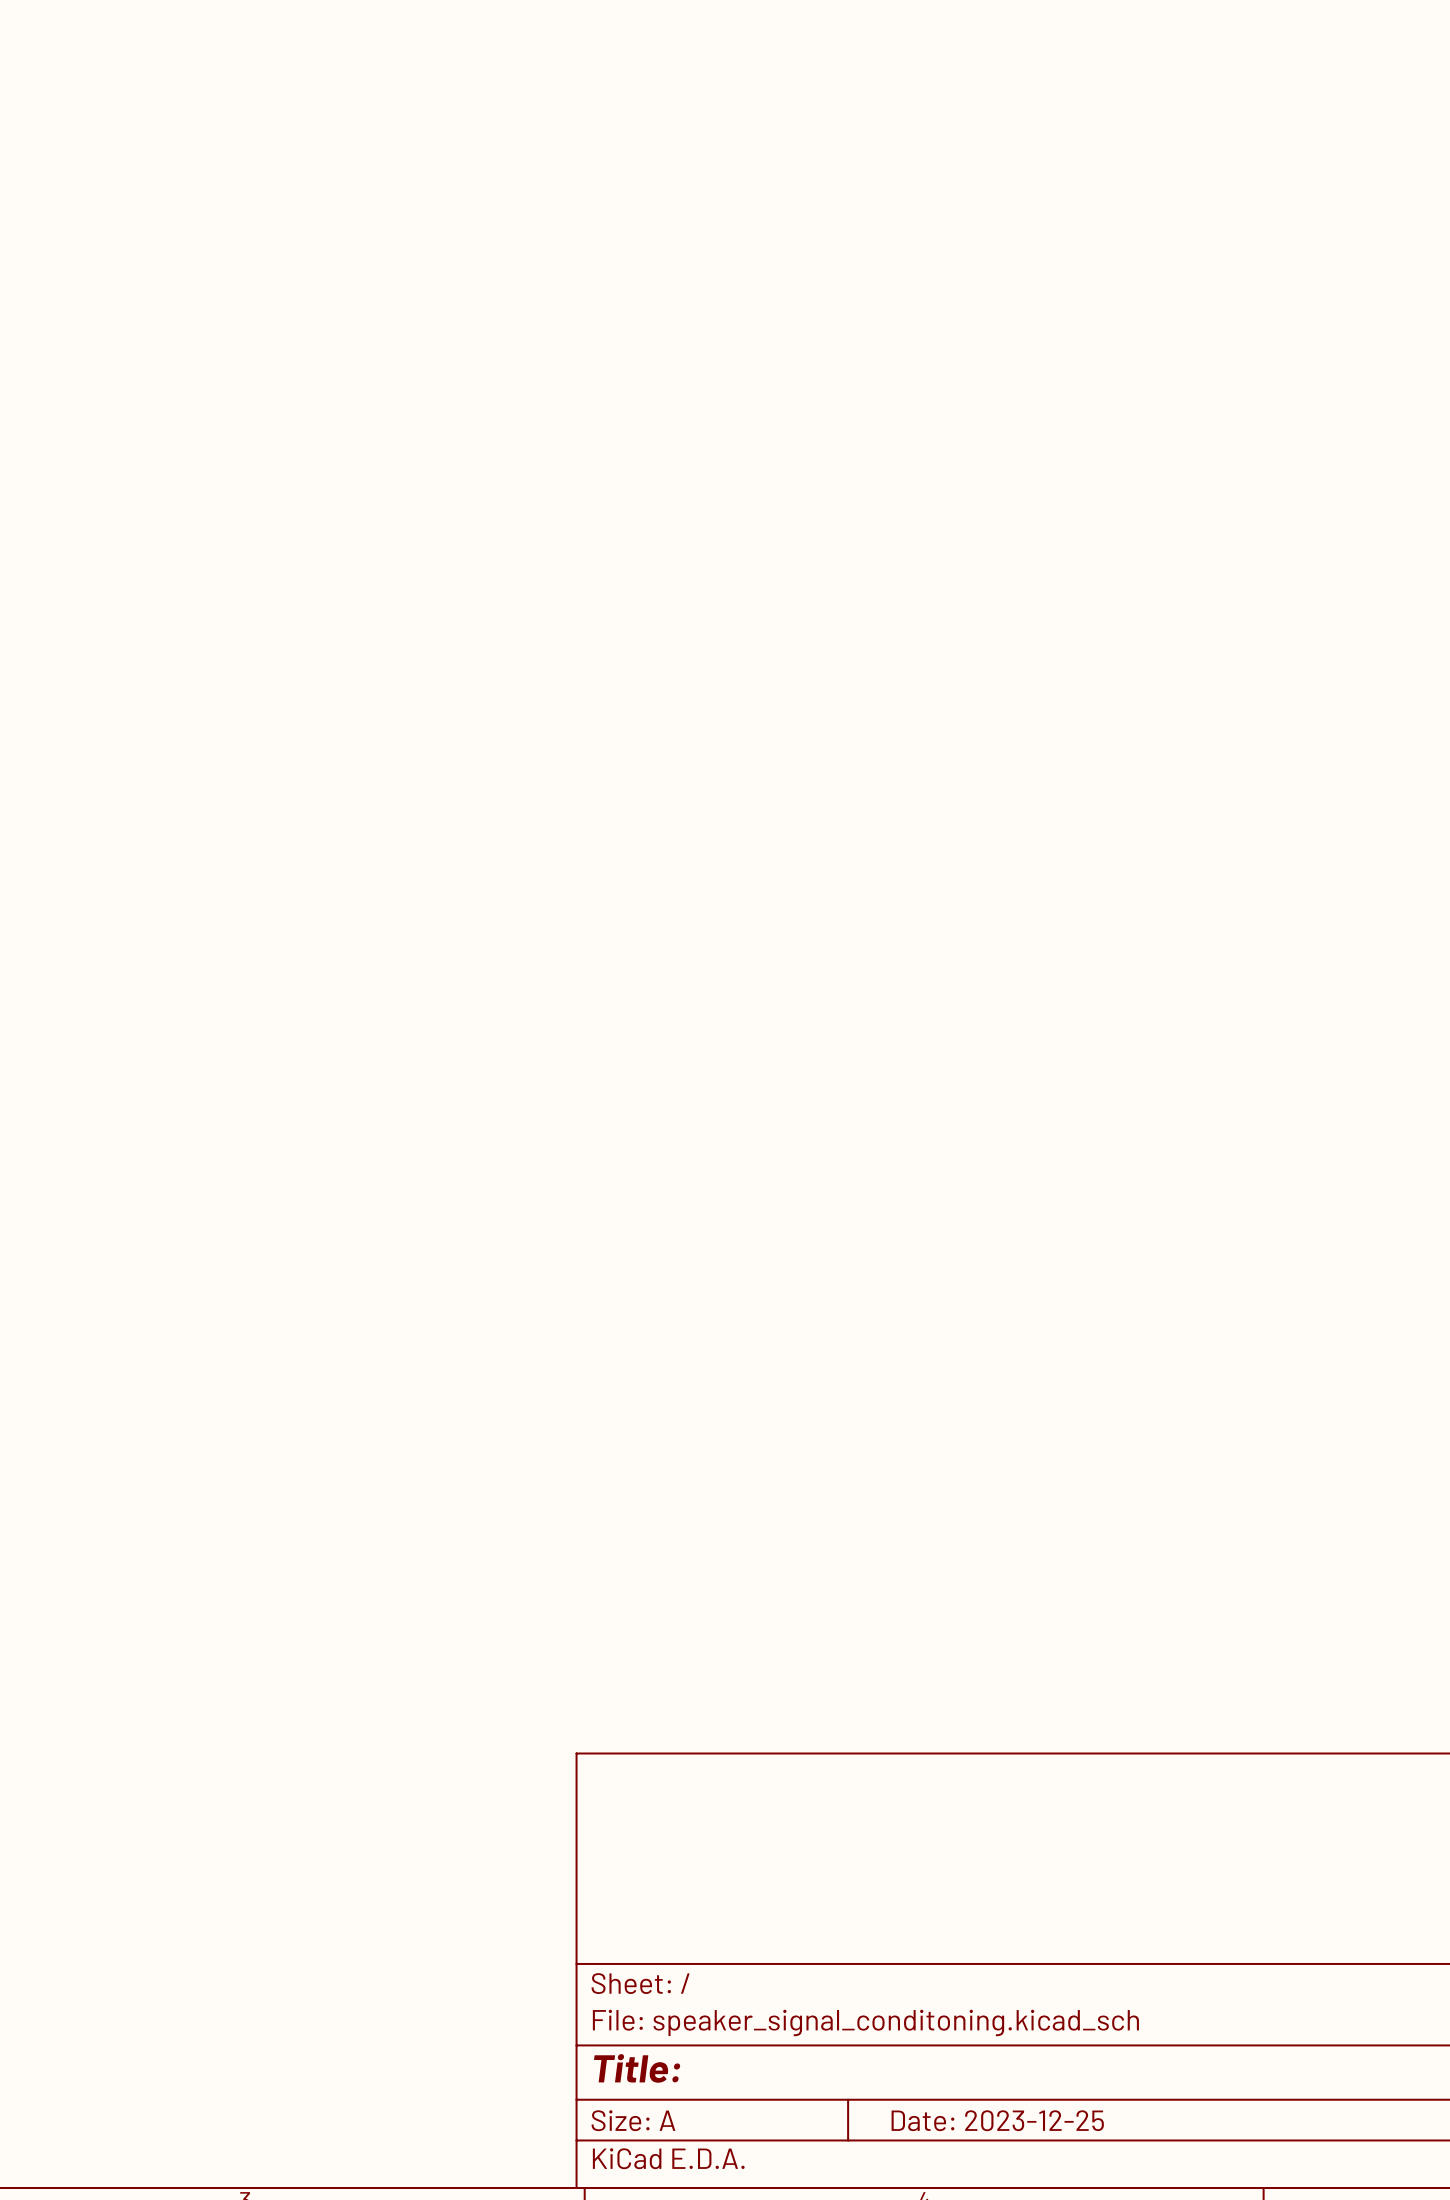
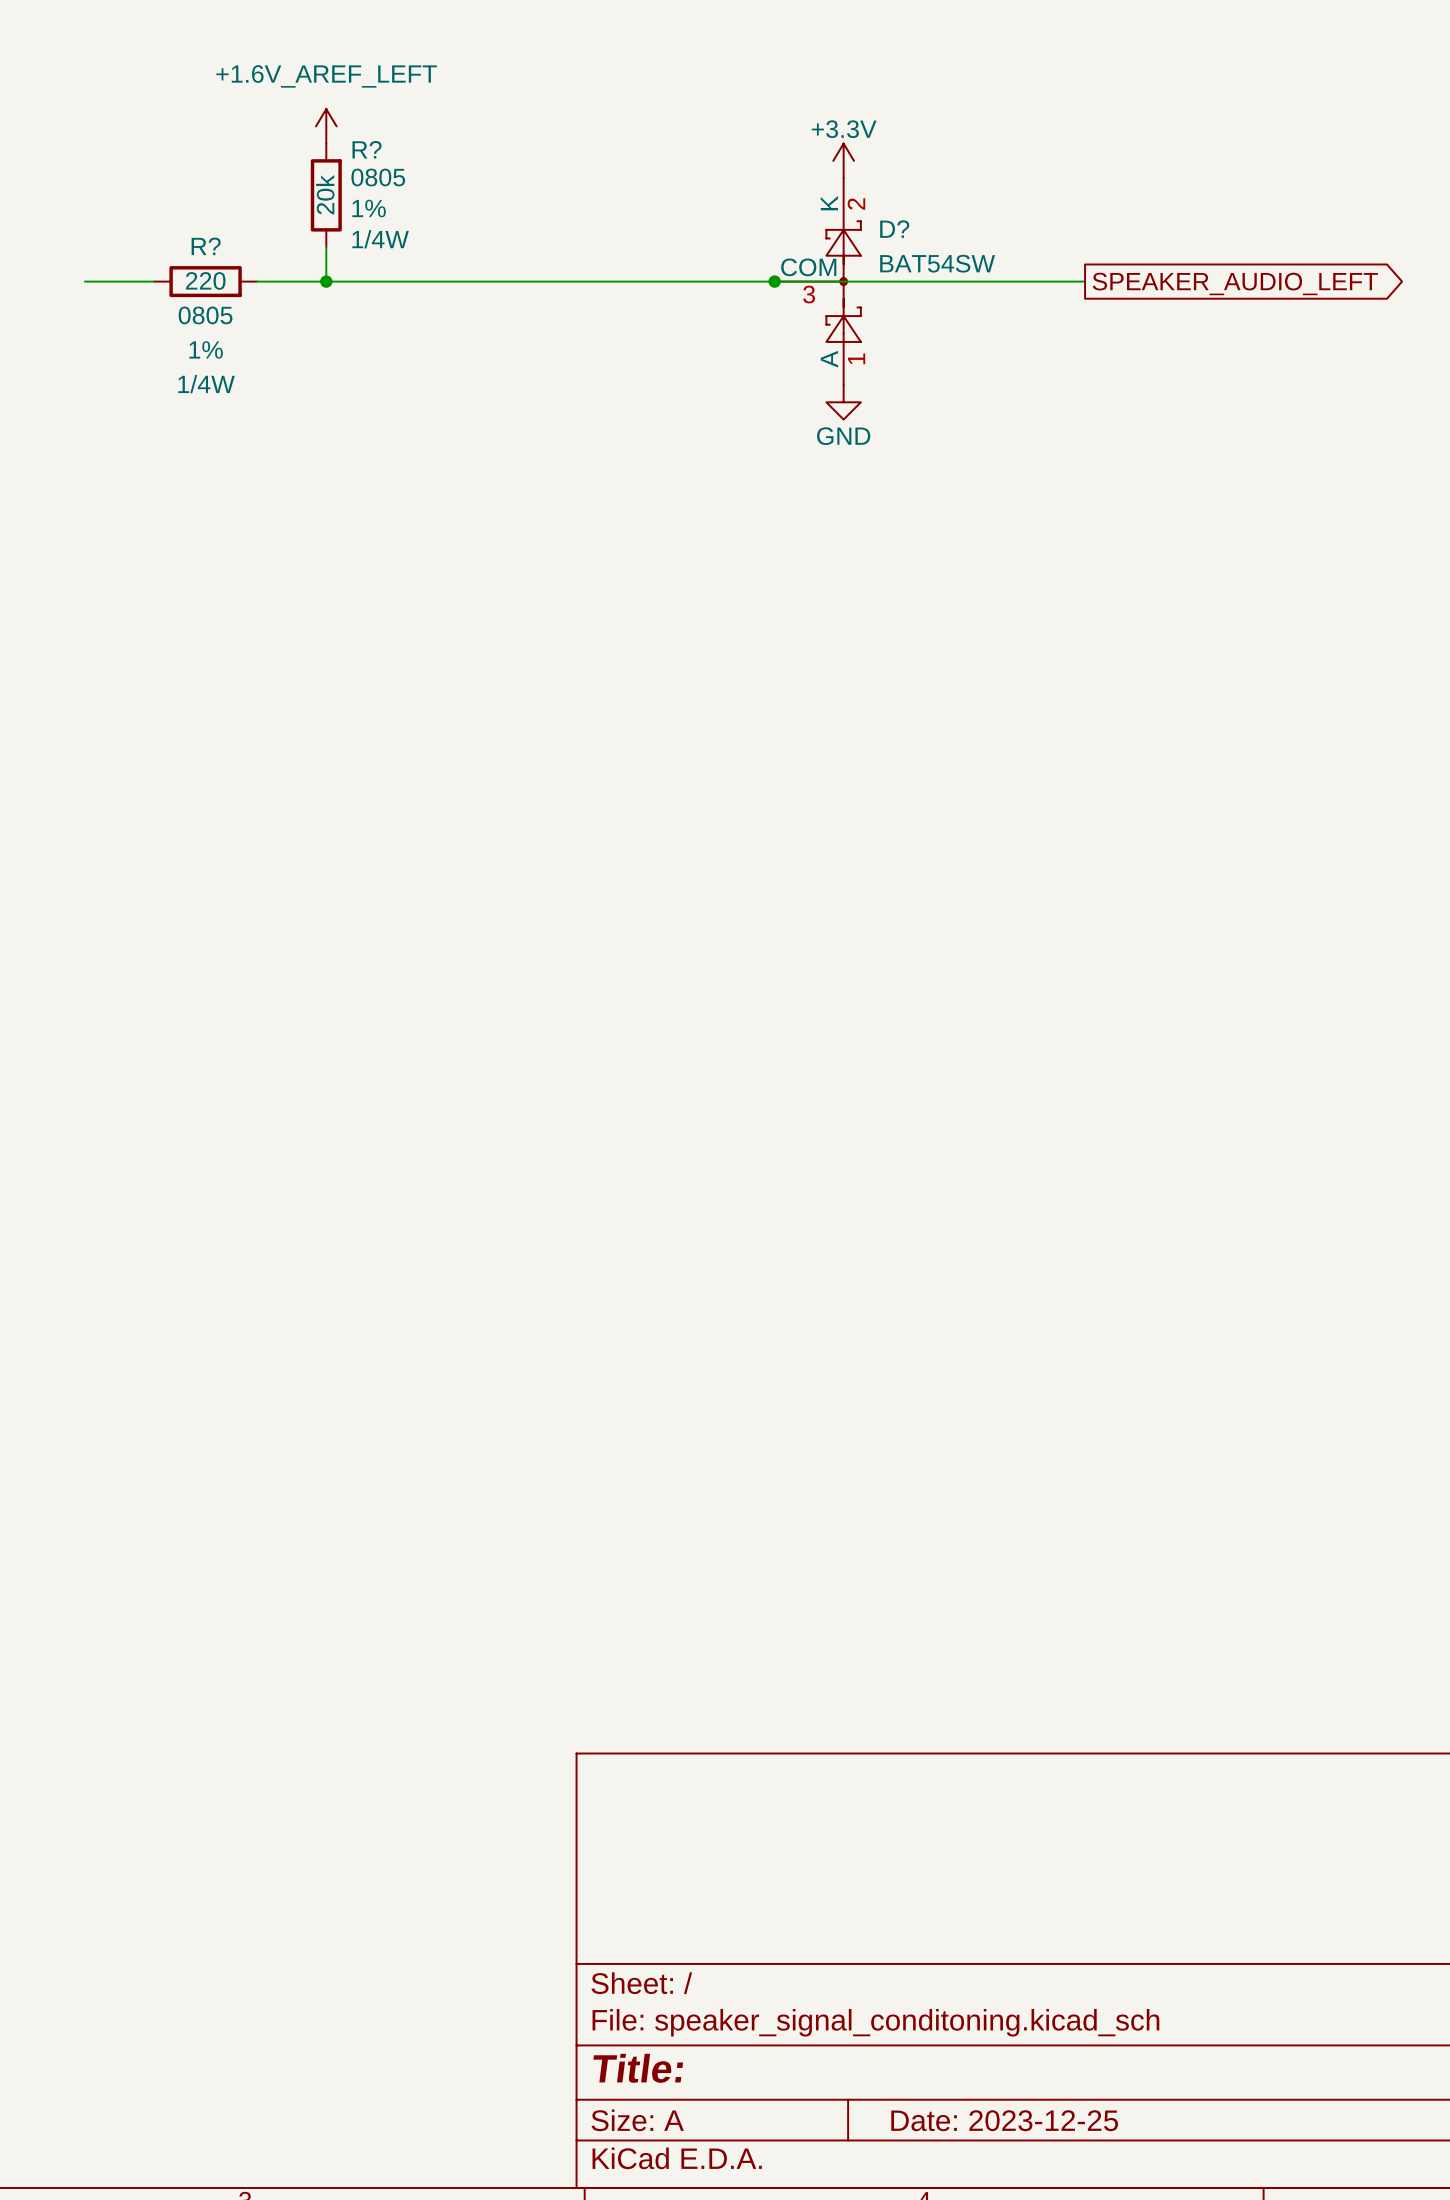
power symbol: none -> +1.6V_AREF_LEFT (326, 126)
power symbol: none -> +3.3V (843, 160)
R?: none -> 20k (326, 195)
wire: none -> (326, 247) (326, 281)
wire: none -> (84, 281) (153, 281)
R?: none -> 220 (205, 281)
wire: none -> (257, 281) (1085, 281)
junction: none -> (326, 281)
junction: none -> (774, 281)
D?: none -> BAT54SW (817, 281)
global label: none -> SPEAKER_AUDIO_LEFT (1235, 283)
power symbol: none -> GND (843, 402)

